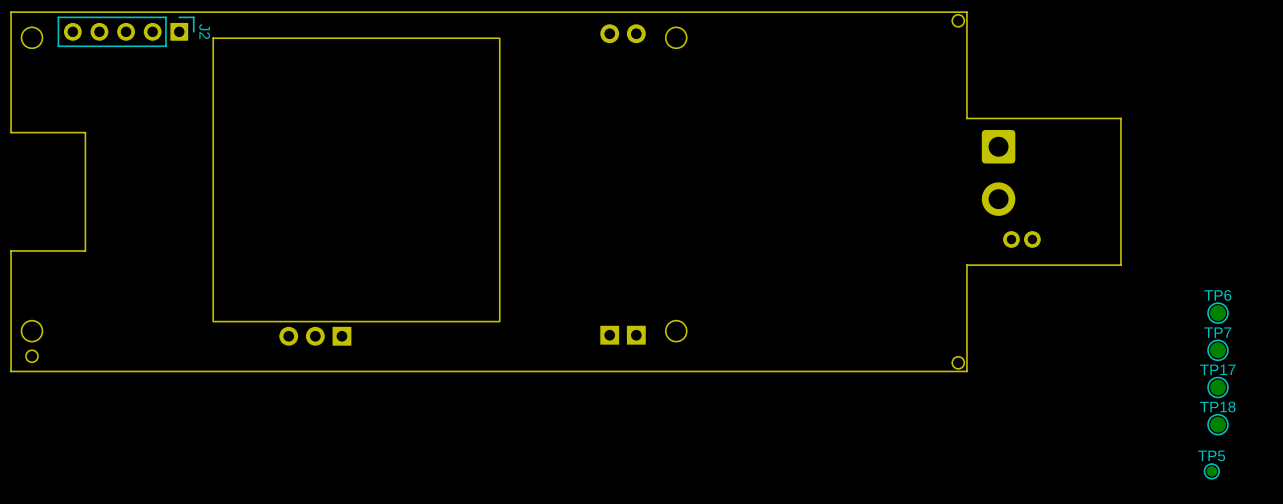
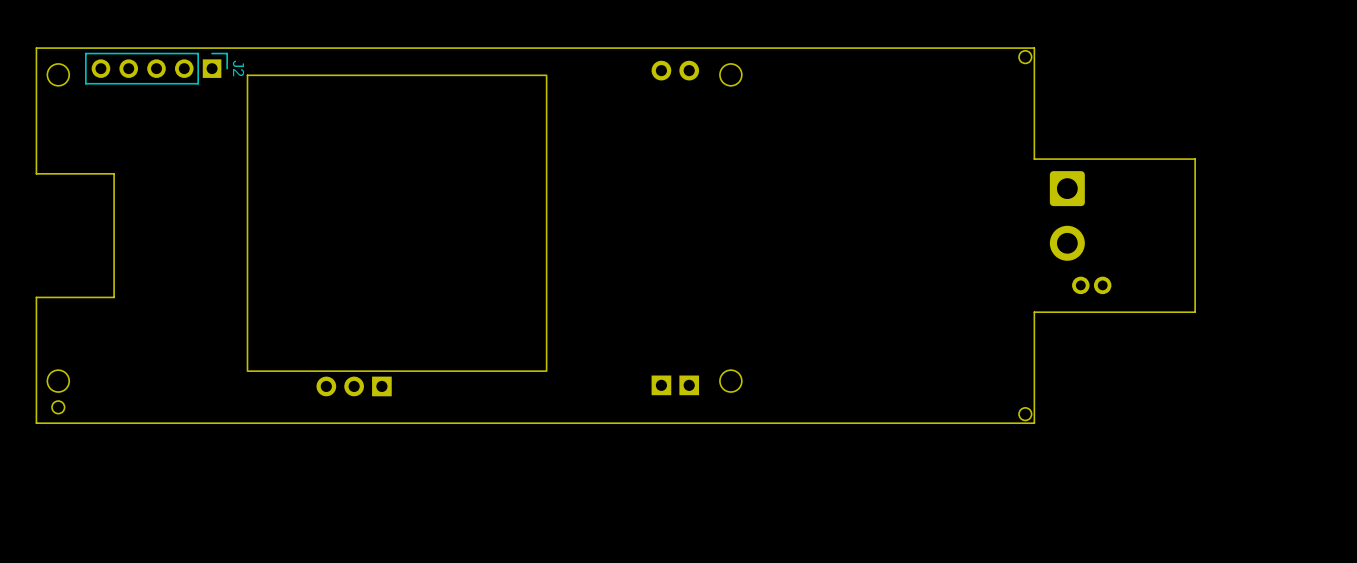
TP6: (1217, 313) -> none
TP7: (1217, 350) -> none
TP17: (1217, 387) -> none
TP18: (1217, 424) -> none
TP5: (1211, 471) -> none

